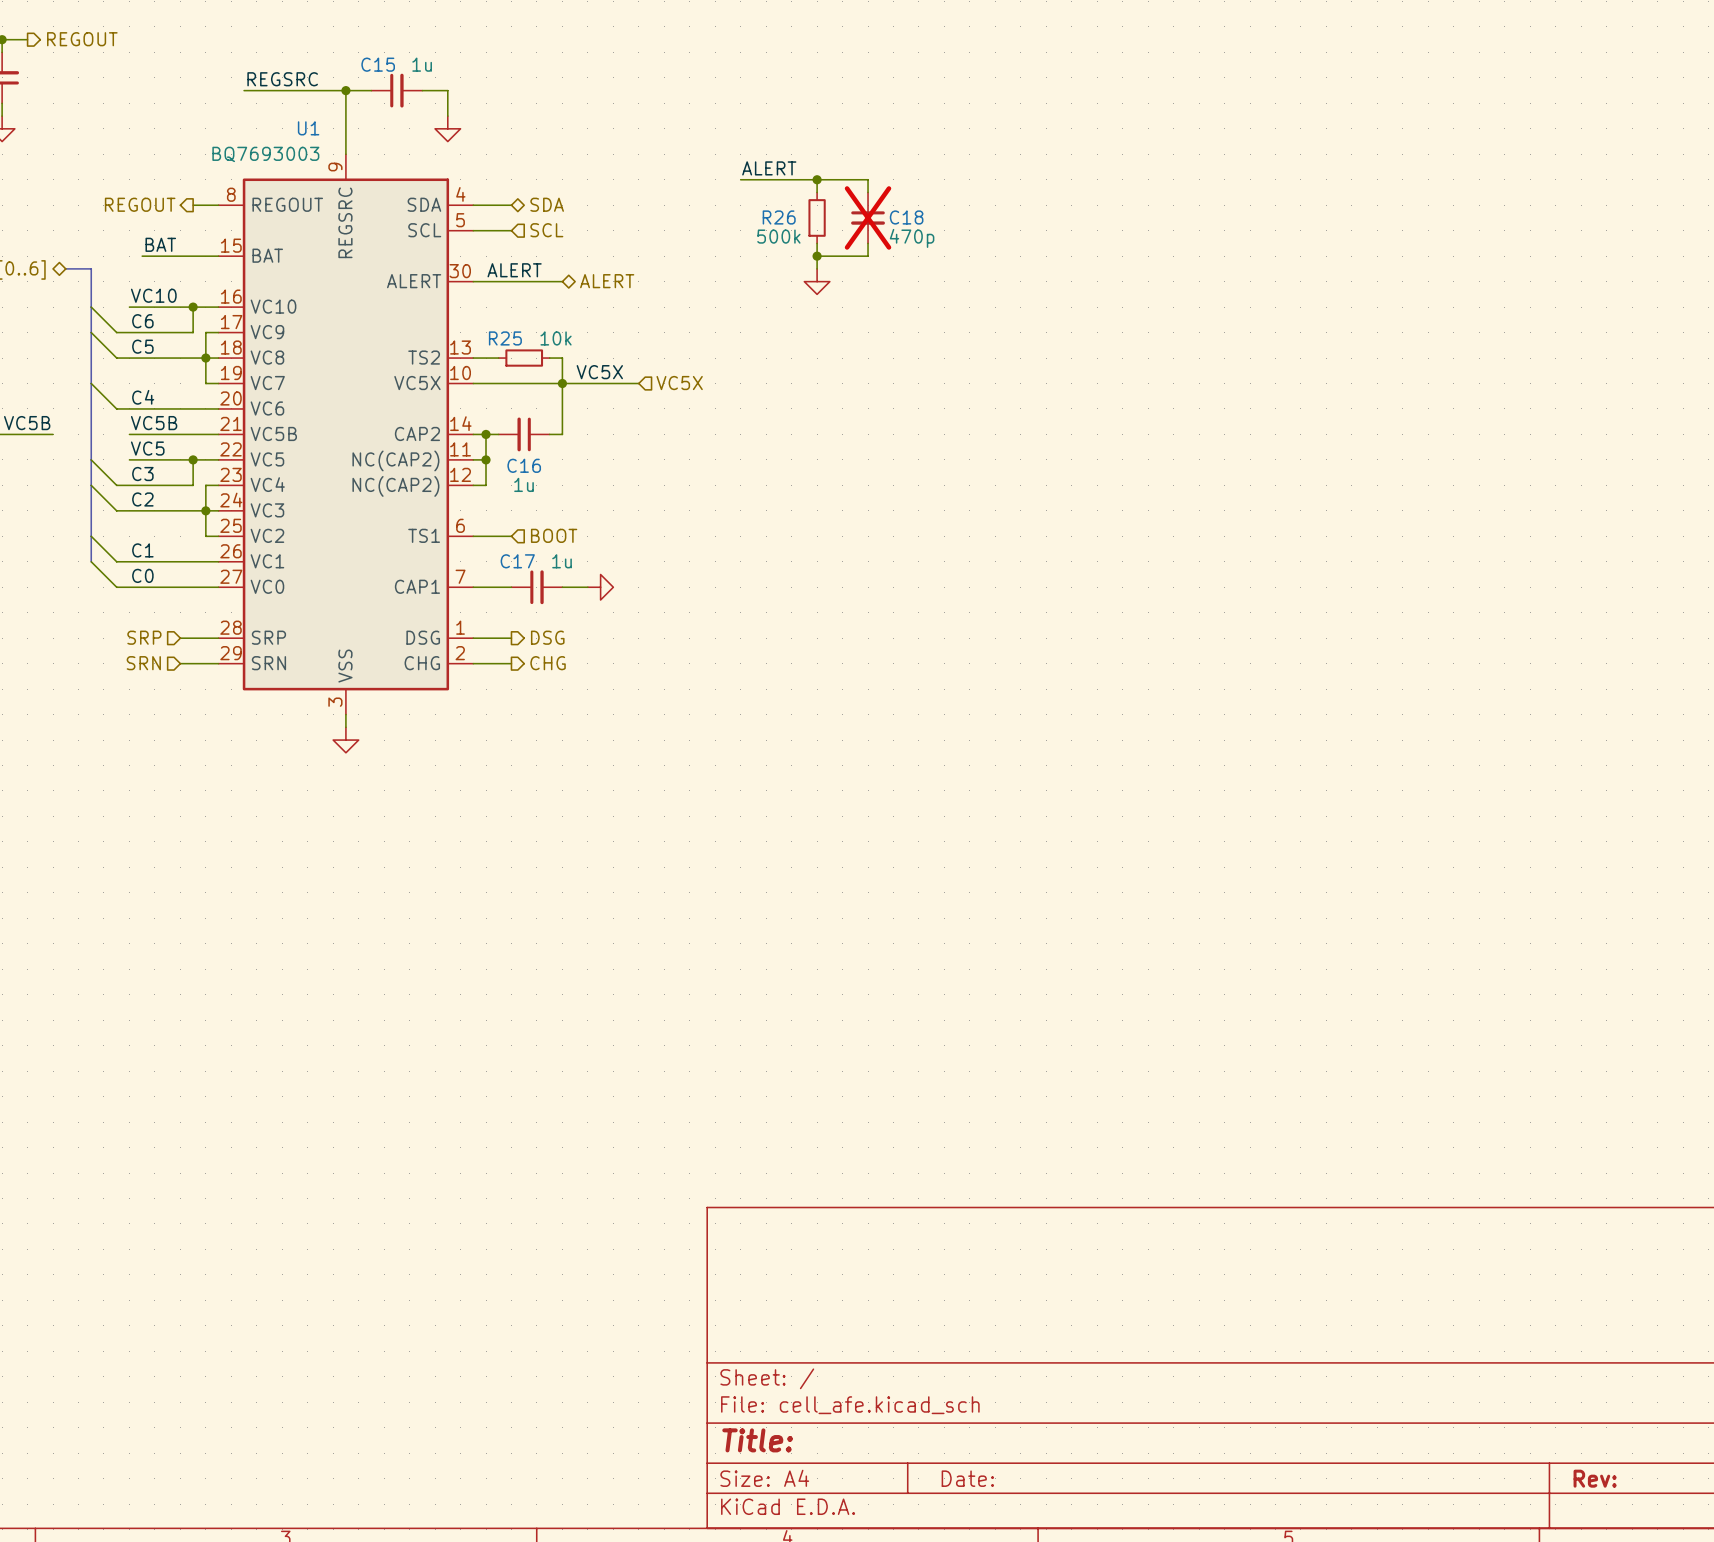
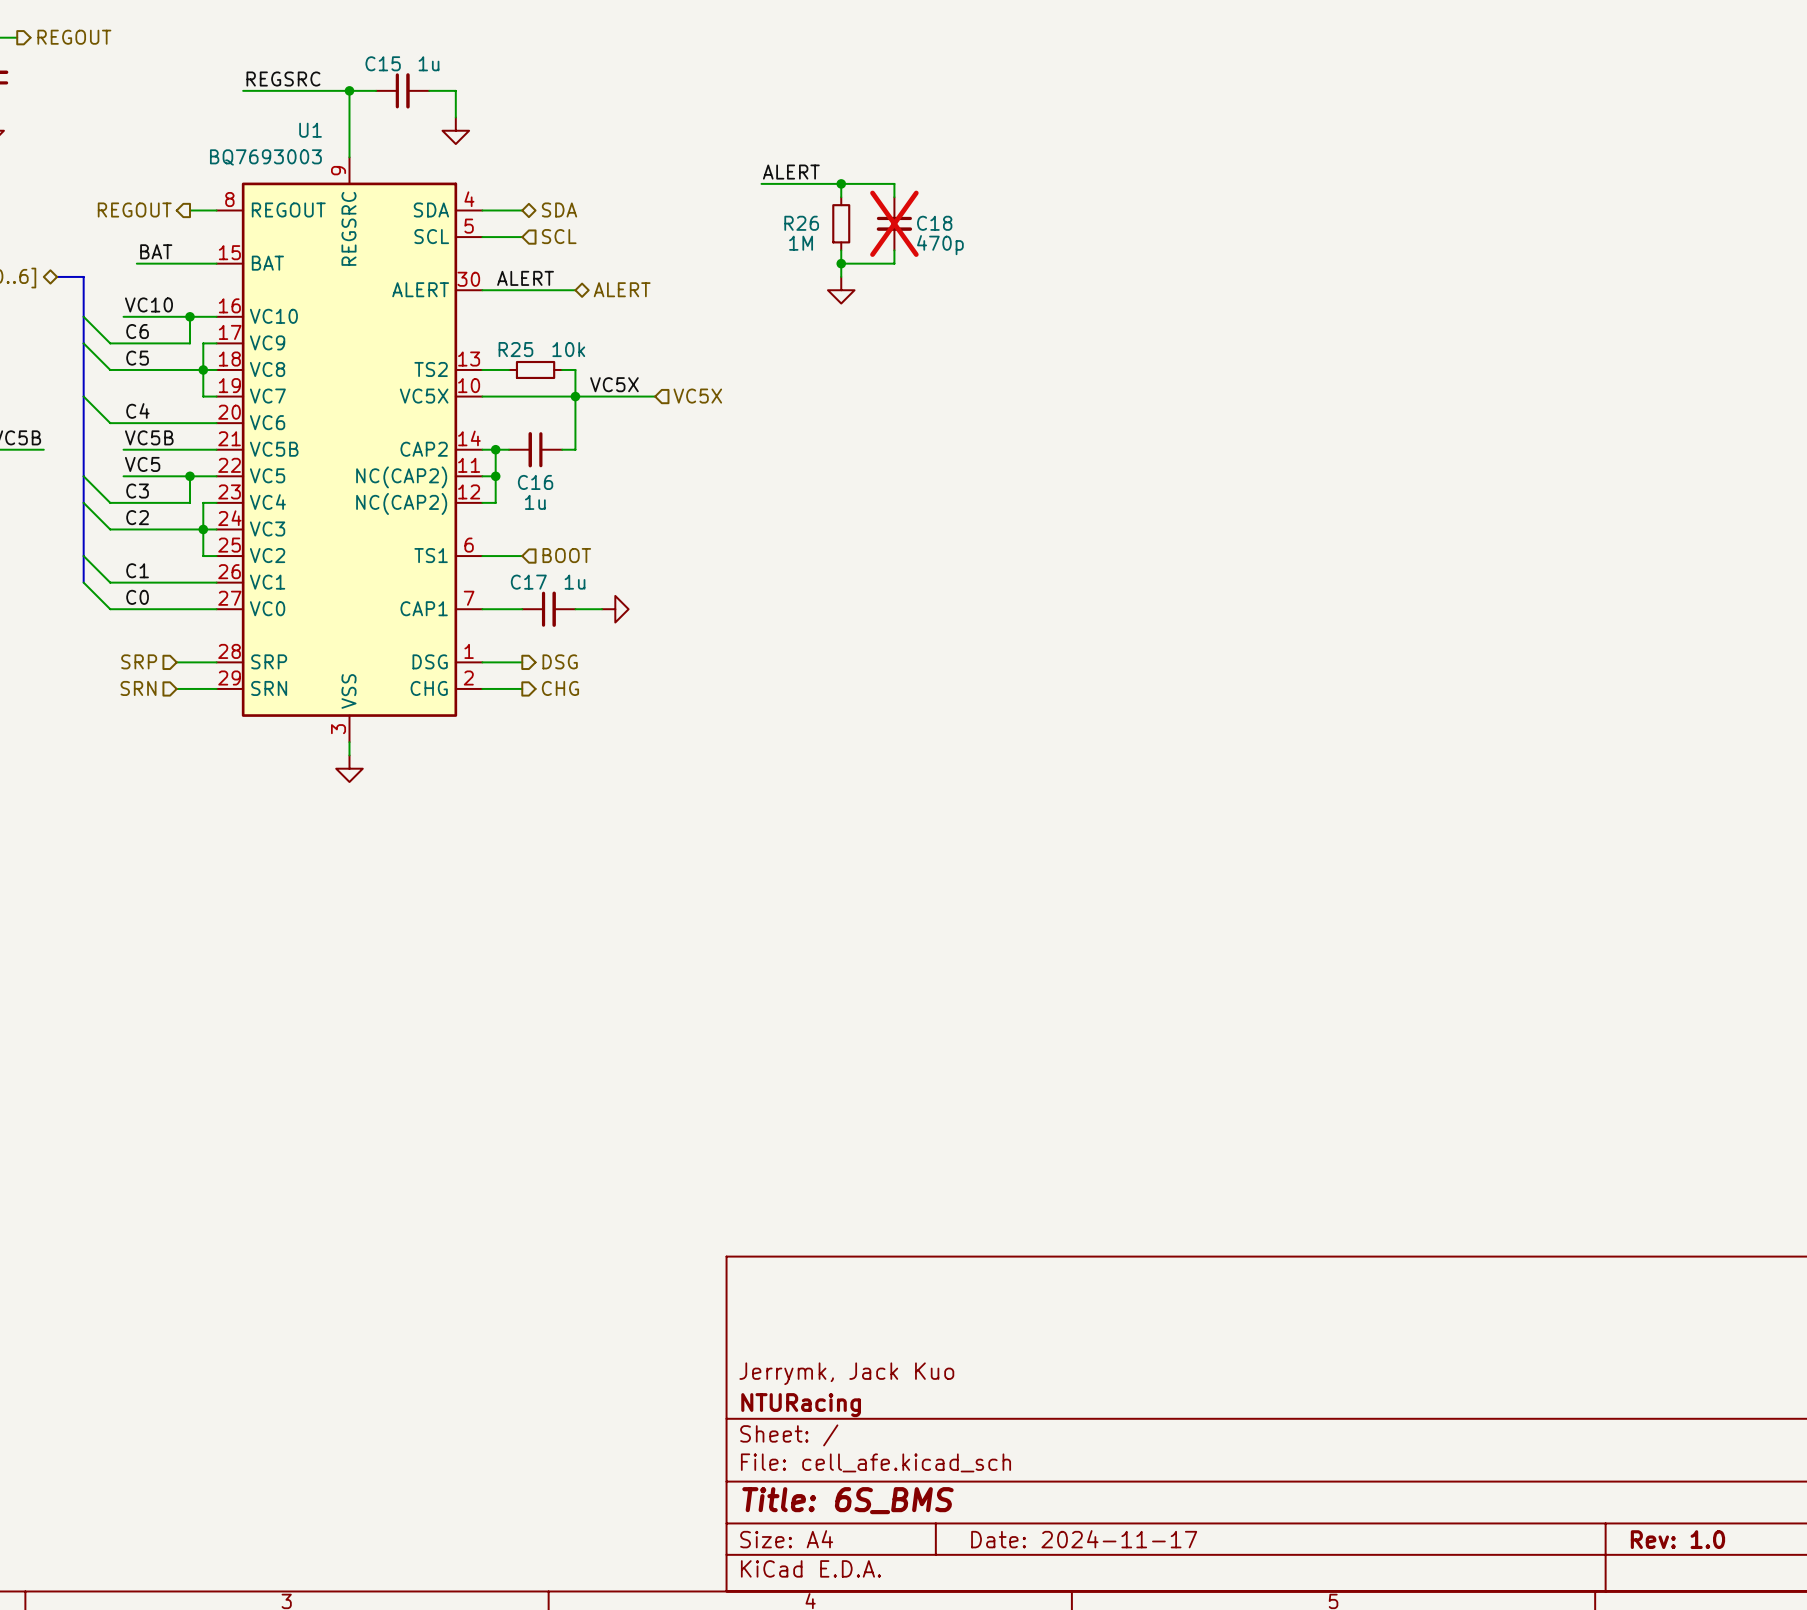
R26 value: 500k (778, 236) -> 1M (801, 243)
title block: none -> Jerrymk, Jack Kuo (846, 1373)
title block: none -> NTURacing (801, 1405)
title block: Title: (757, 1440) -> Title: 6S_BMS (847, 1500)
title block: Date: (967, 1478) -> Date: 2024-11-17 (1084, 1539)
title block: Rev: (1595, 1478) -> Rev: 1.0 (1677, 1539)

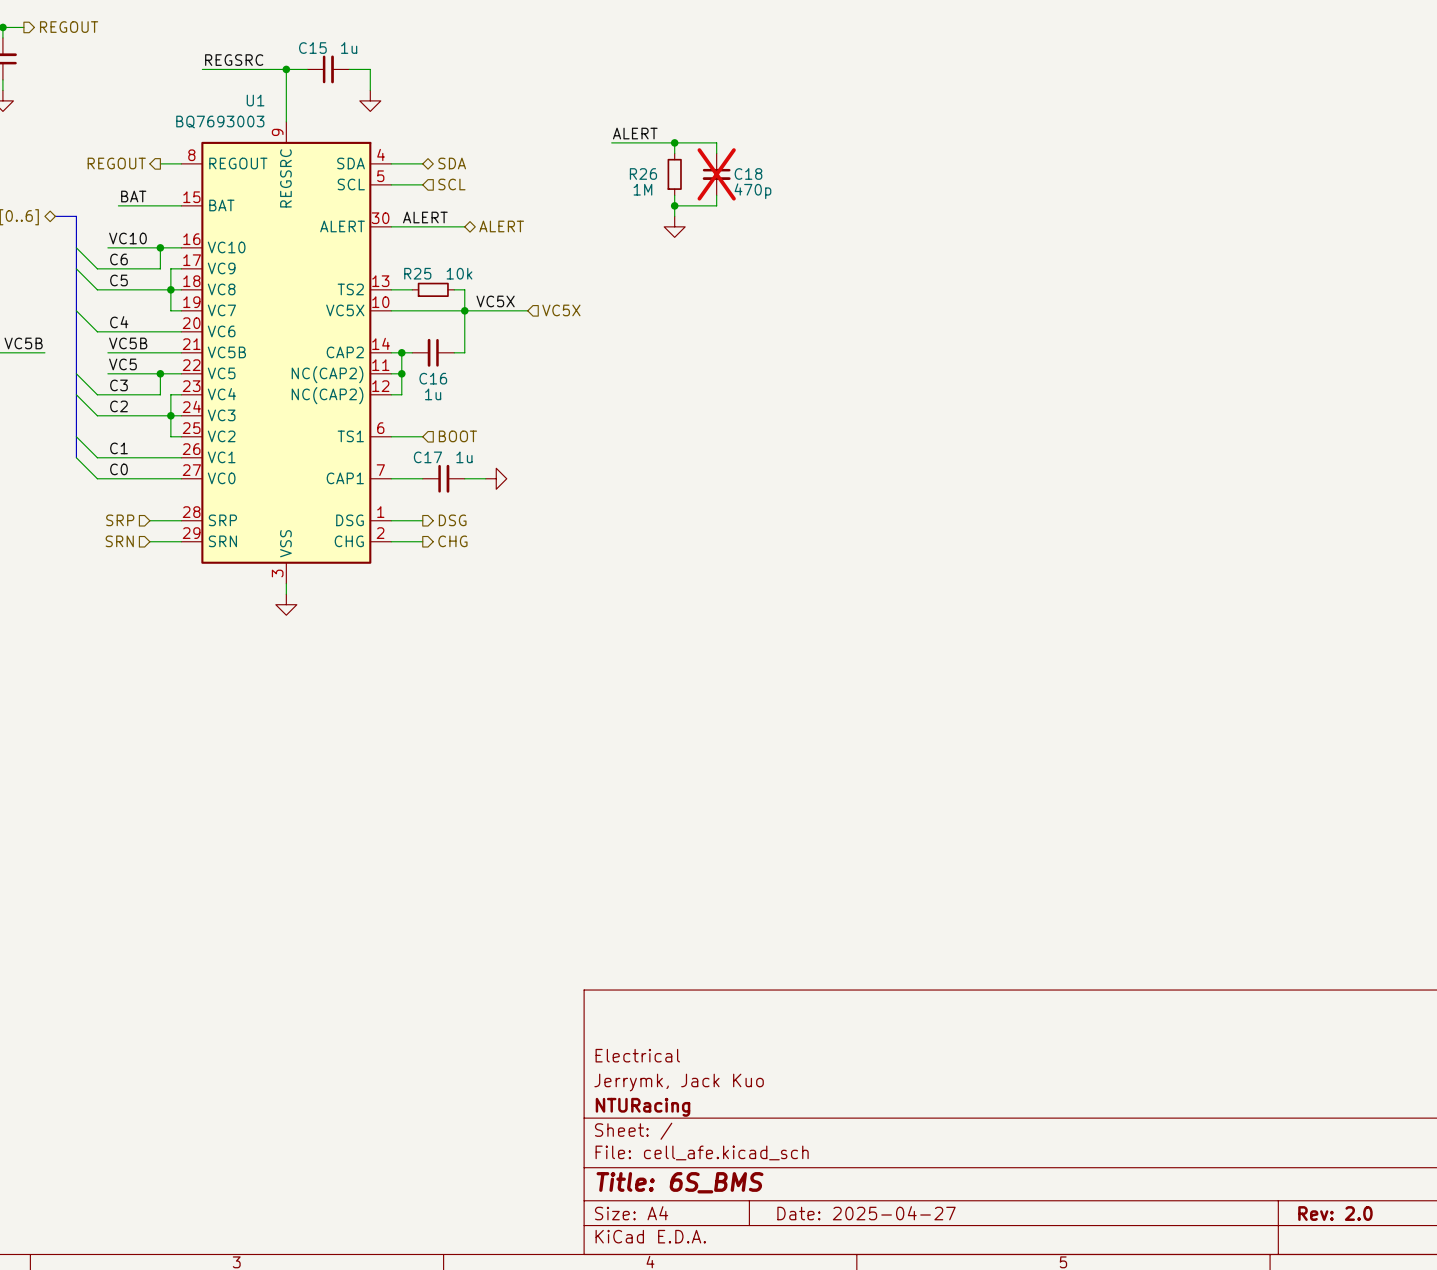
title block: none -> Electrical (637, 1055)
title block: Date: 2024-11-17 (1084, 1539) -> Date: 2025-04-27 (866, 1213)
title block: Rev: 1.0 (1677, 1539) -> Rev: 2.0 (1335, 1213)

